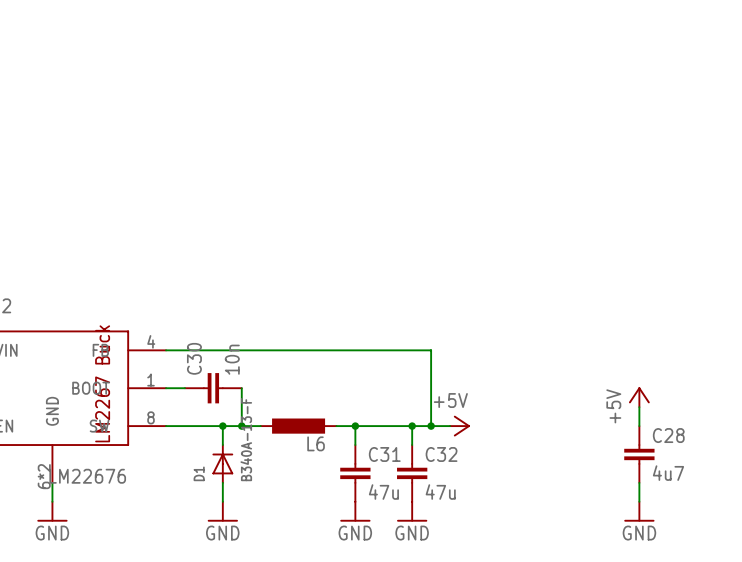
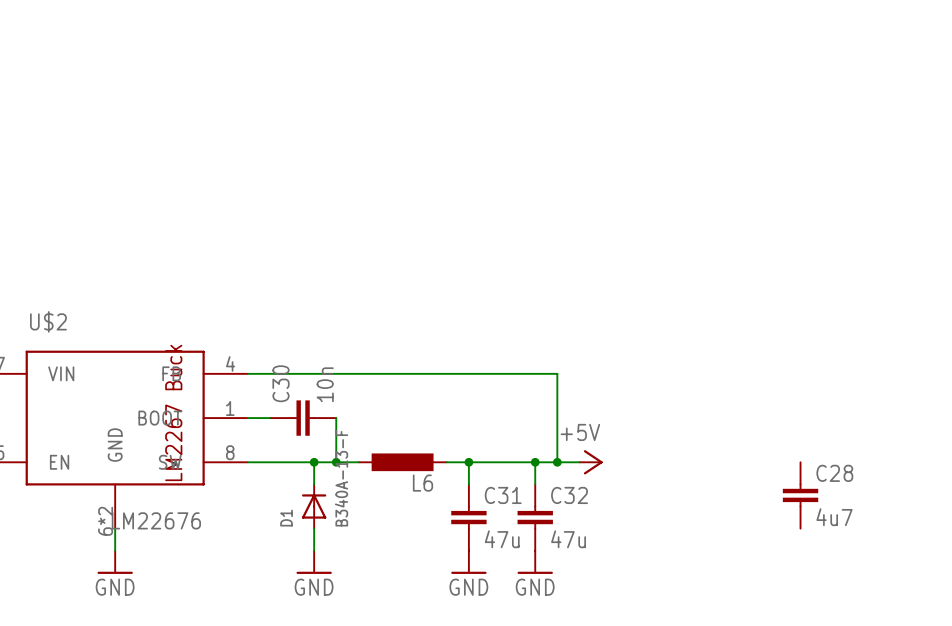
power symbol: +5V (639, 397) -> none
wire: (639, 407) (639, 426) -> none
wire: (639, 482) (639, 501) -> none
power symbol: GND (639, 511) -> none

